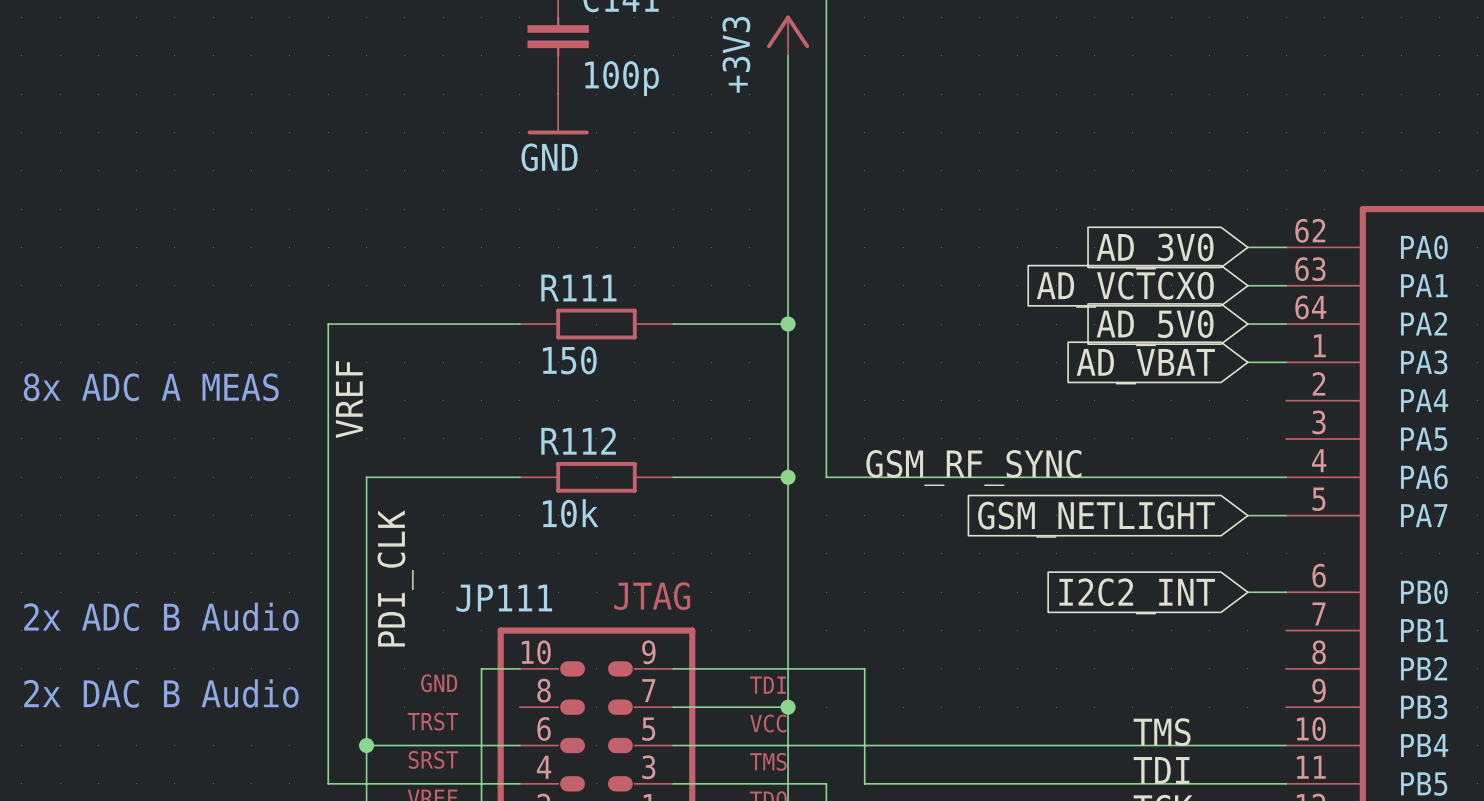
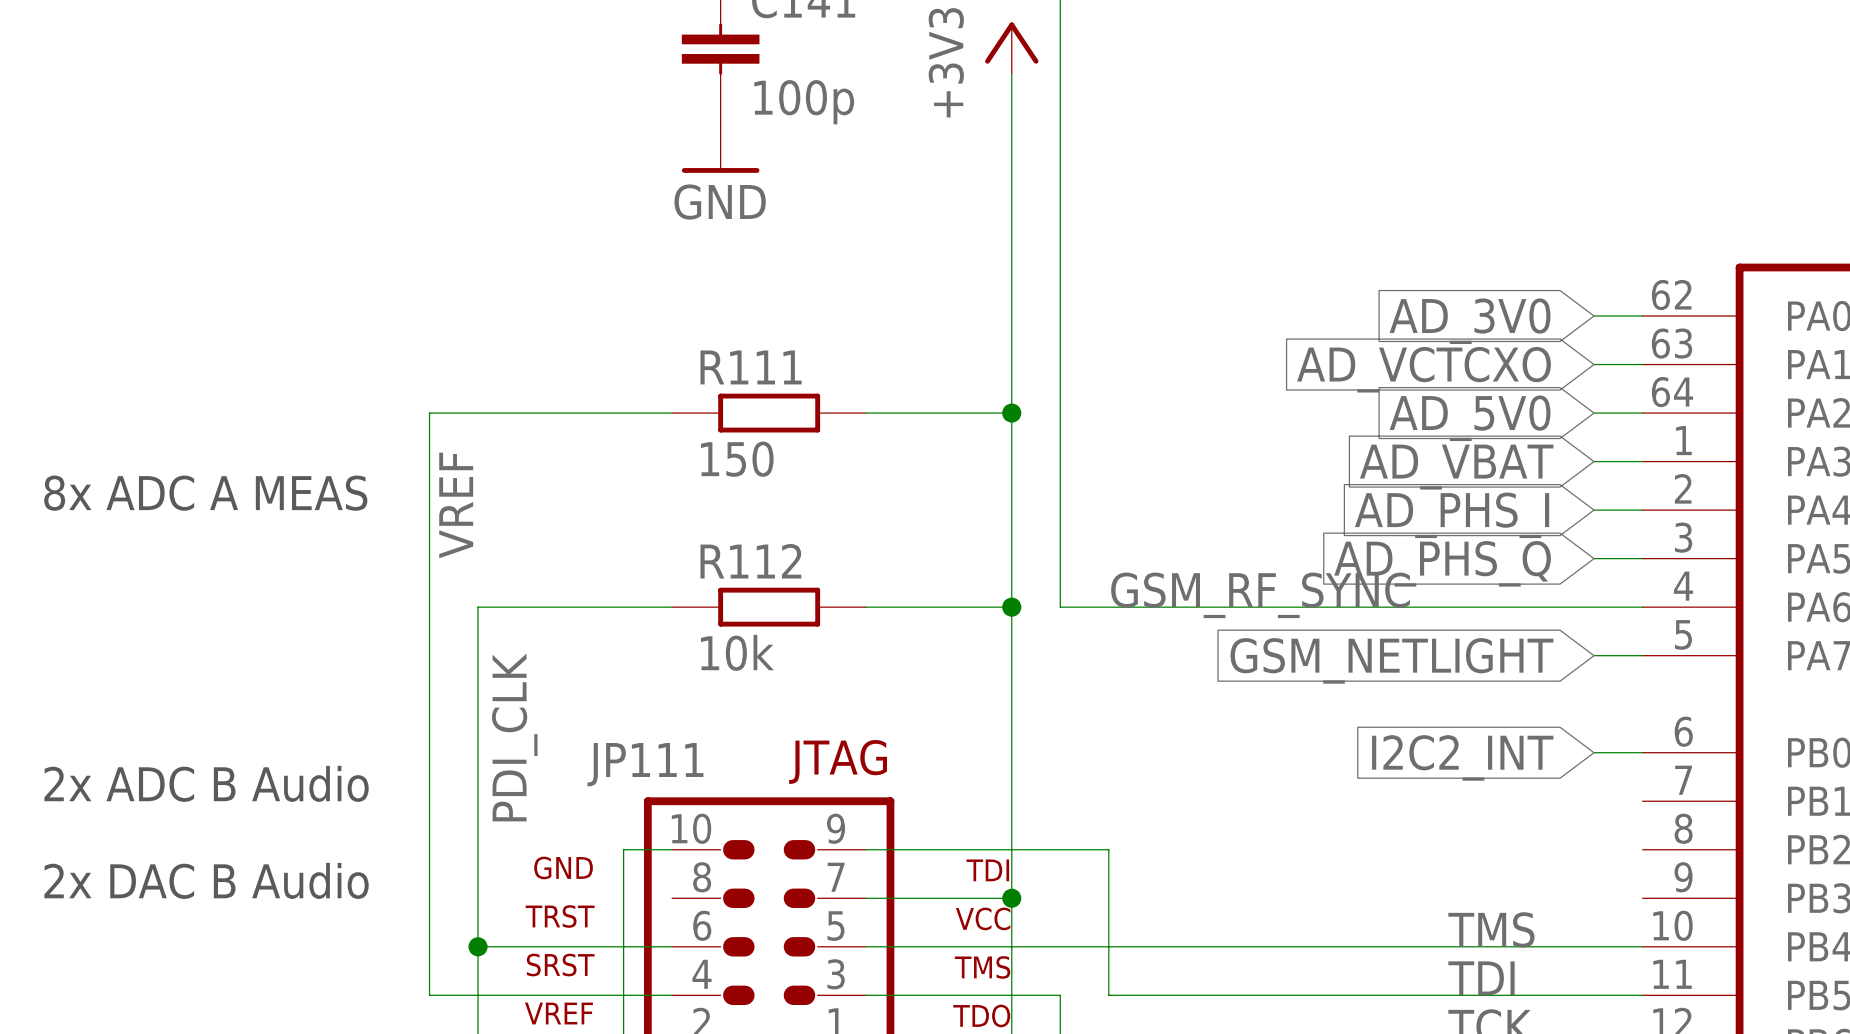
wire: none -> (1594, 510) (1642, 510)
global label: none -> AD_PHS_I (1452, 515)
wire: none -> (1594, 558) (1642, 558)
global label: none -> AD_PHS_Q (1442, 563)

